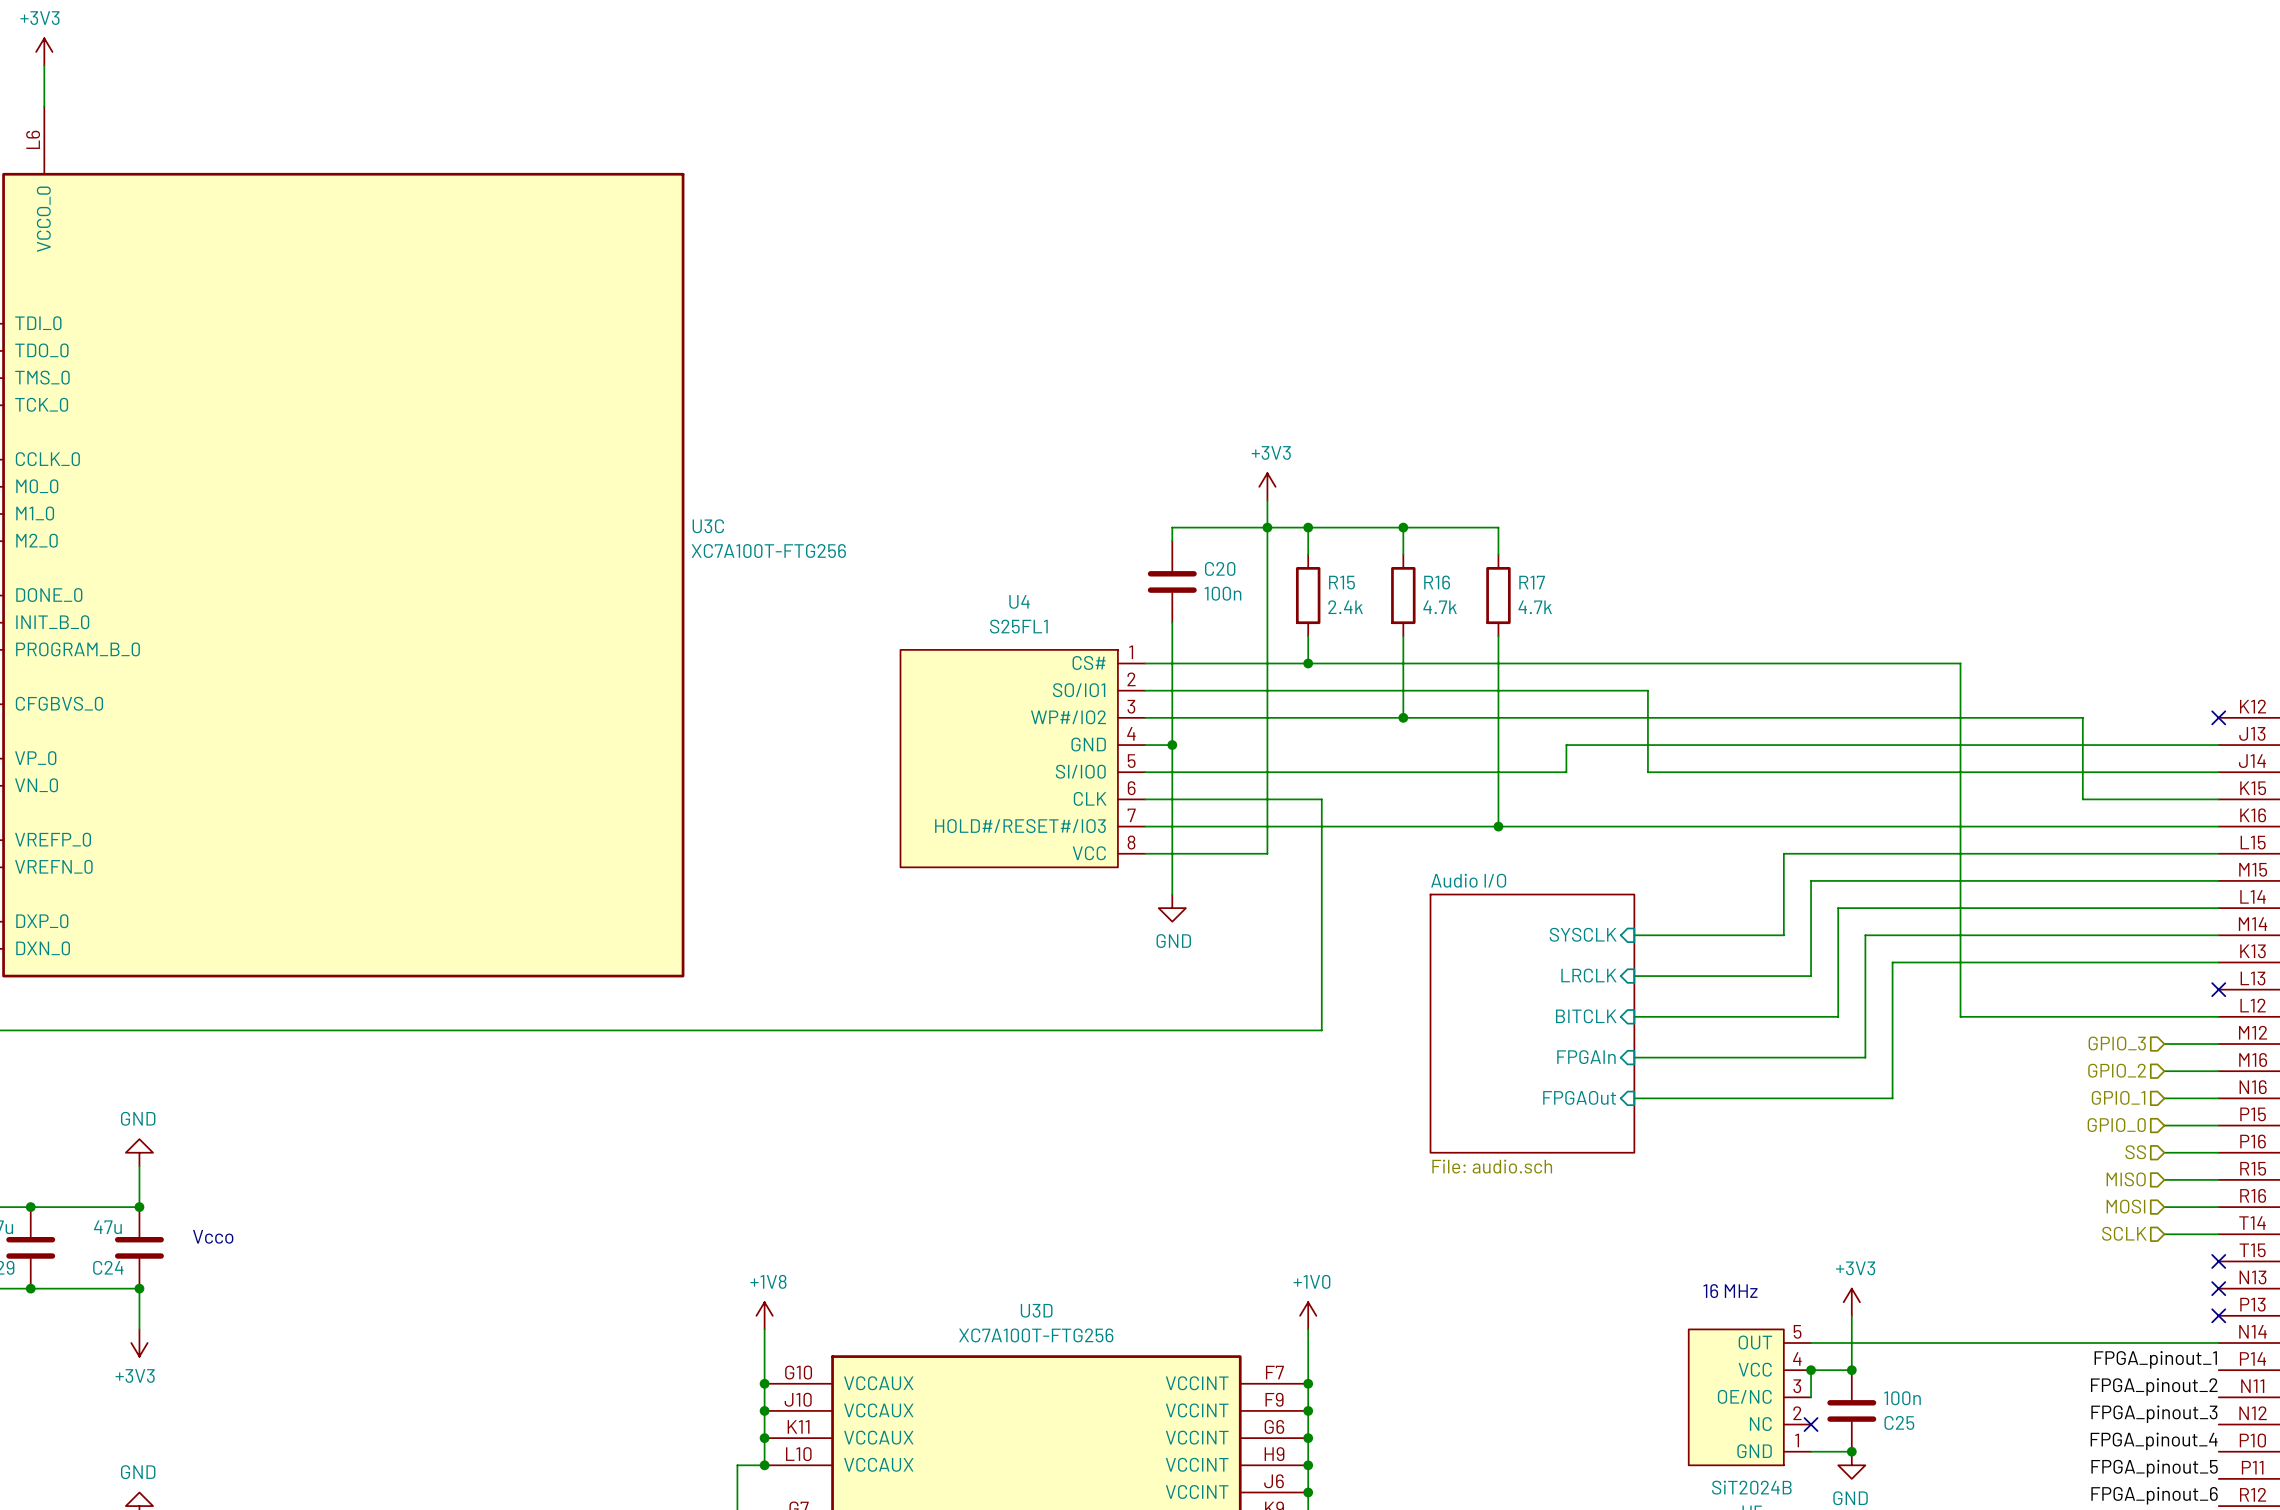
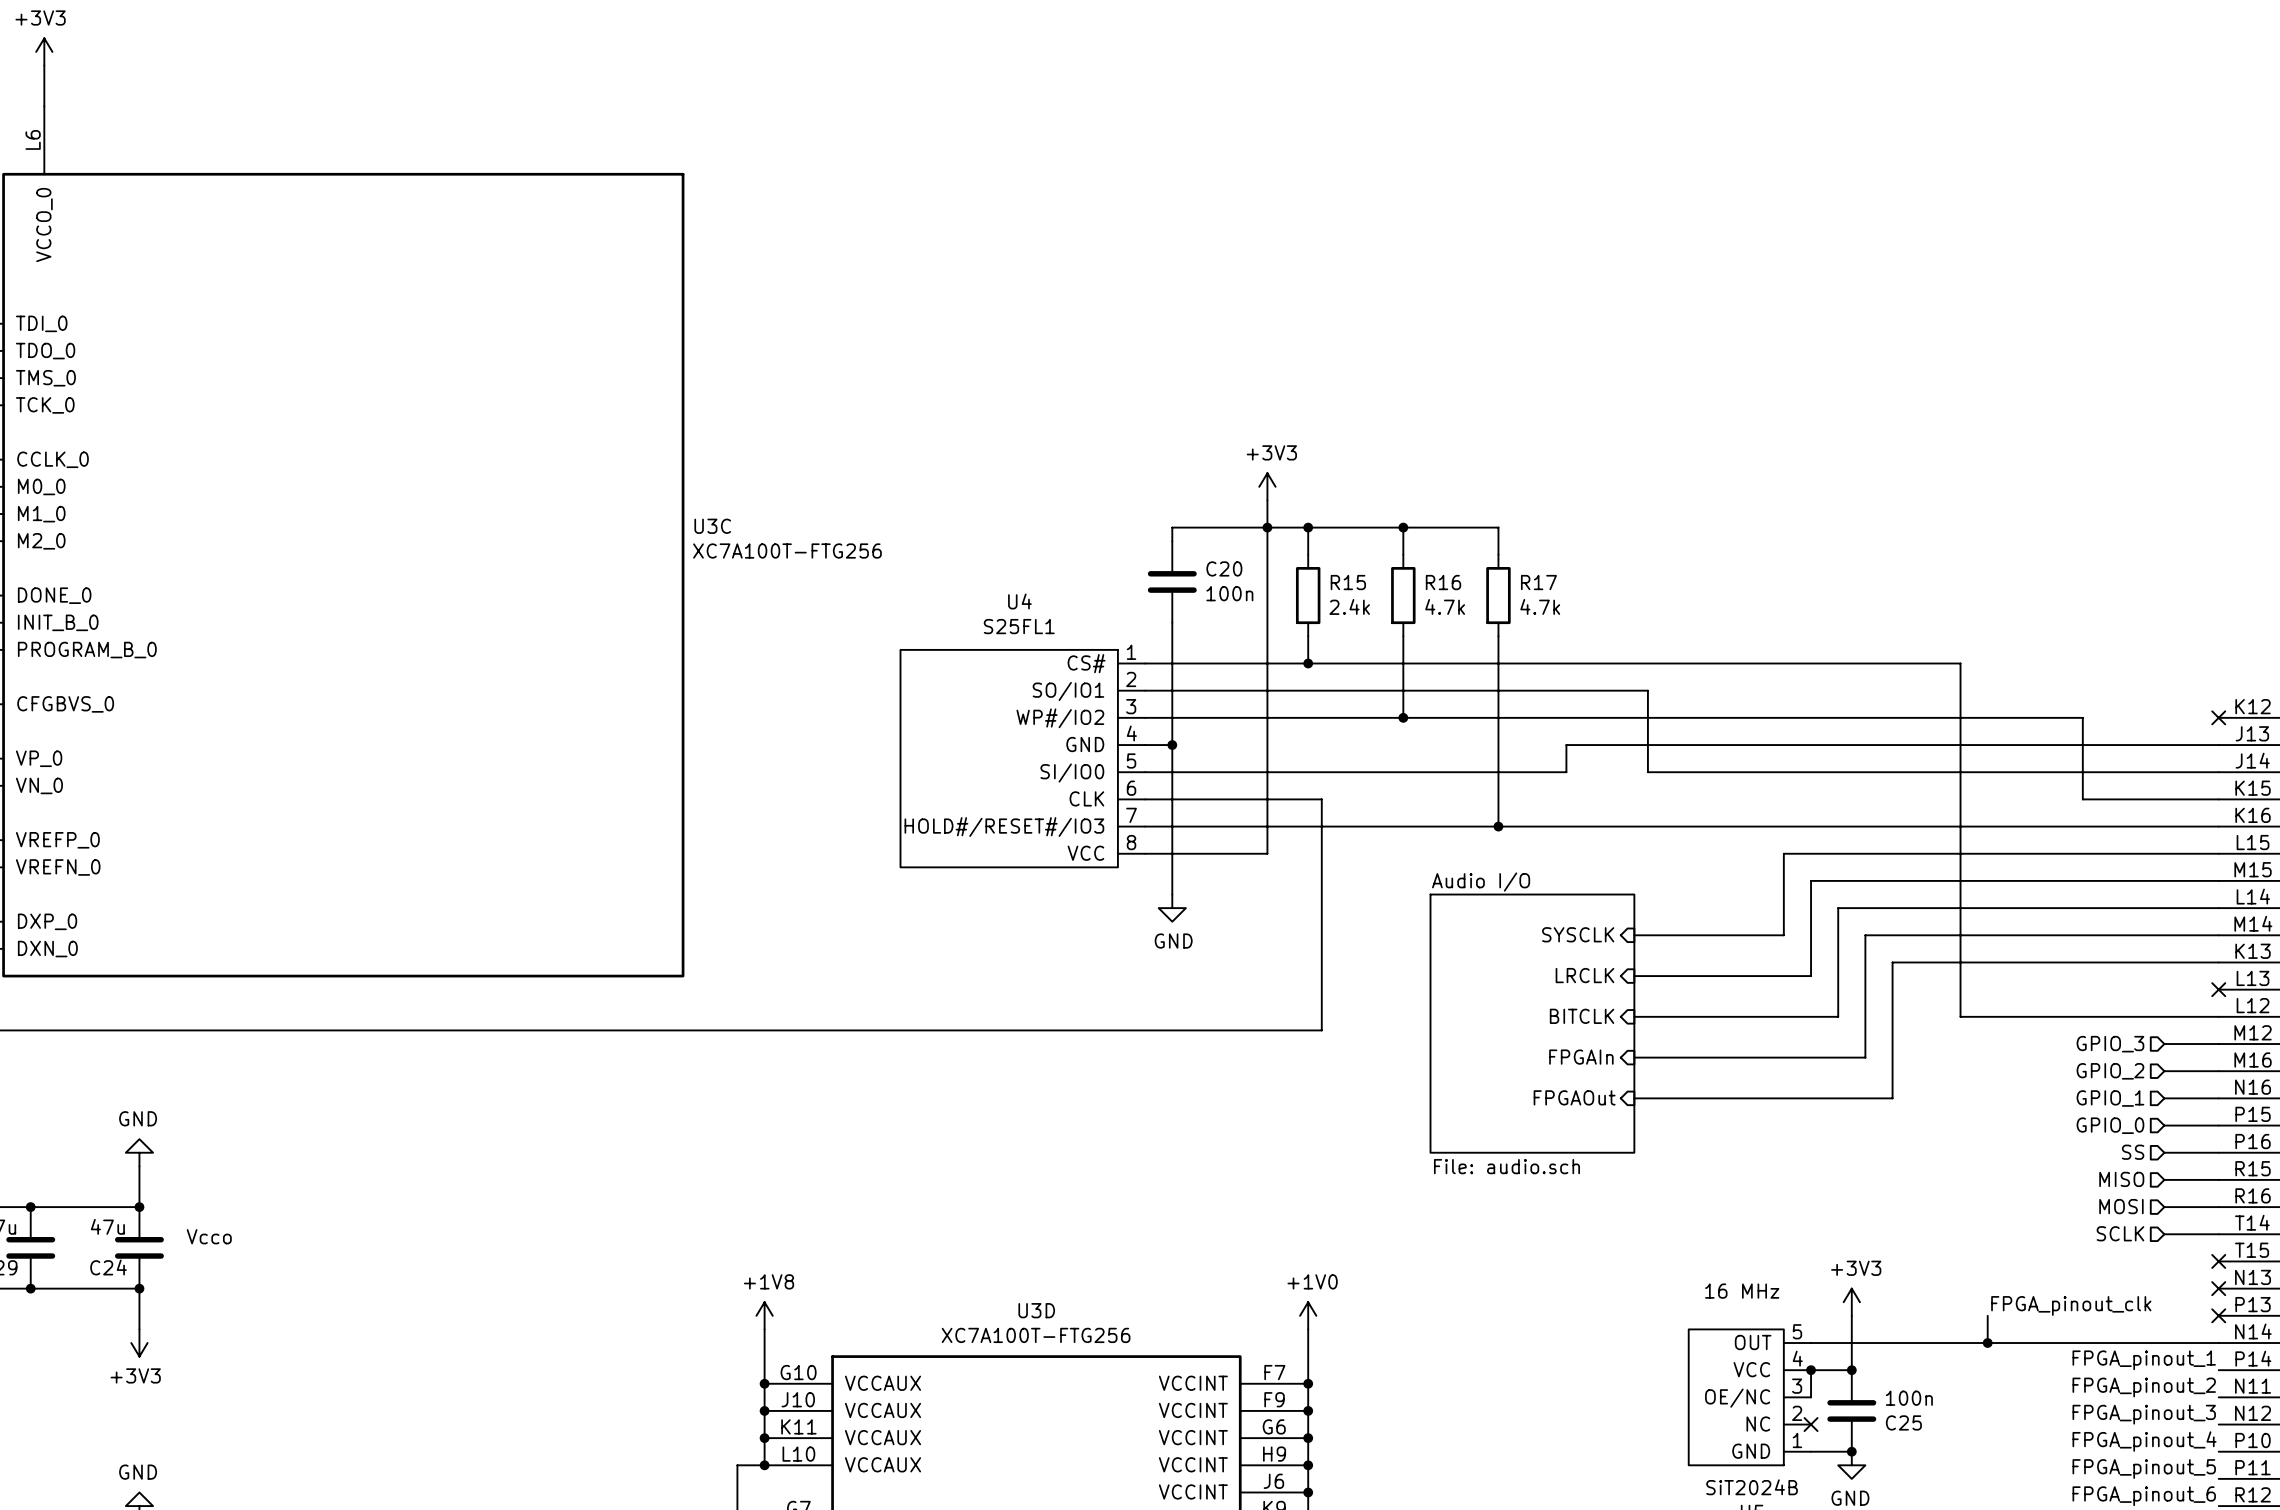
label: none -> FPGA_pinout_clk (2071, 1305)
wire: none -> (1987, 1315) (1987, 1343)
junction: none -> (1987, 1343)

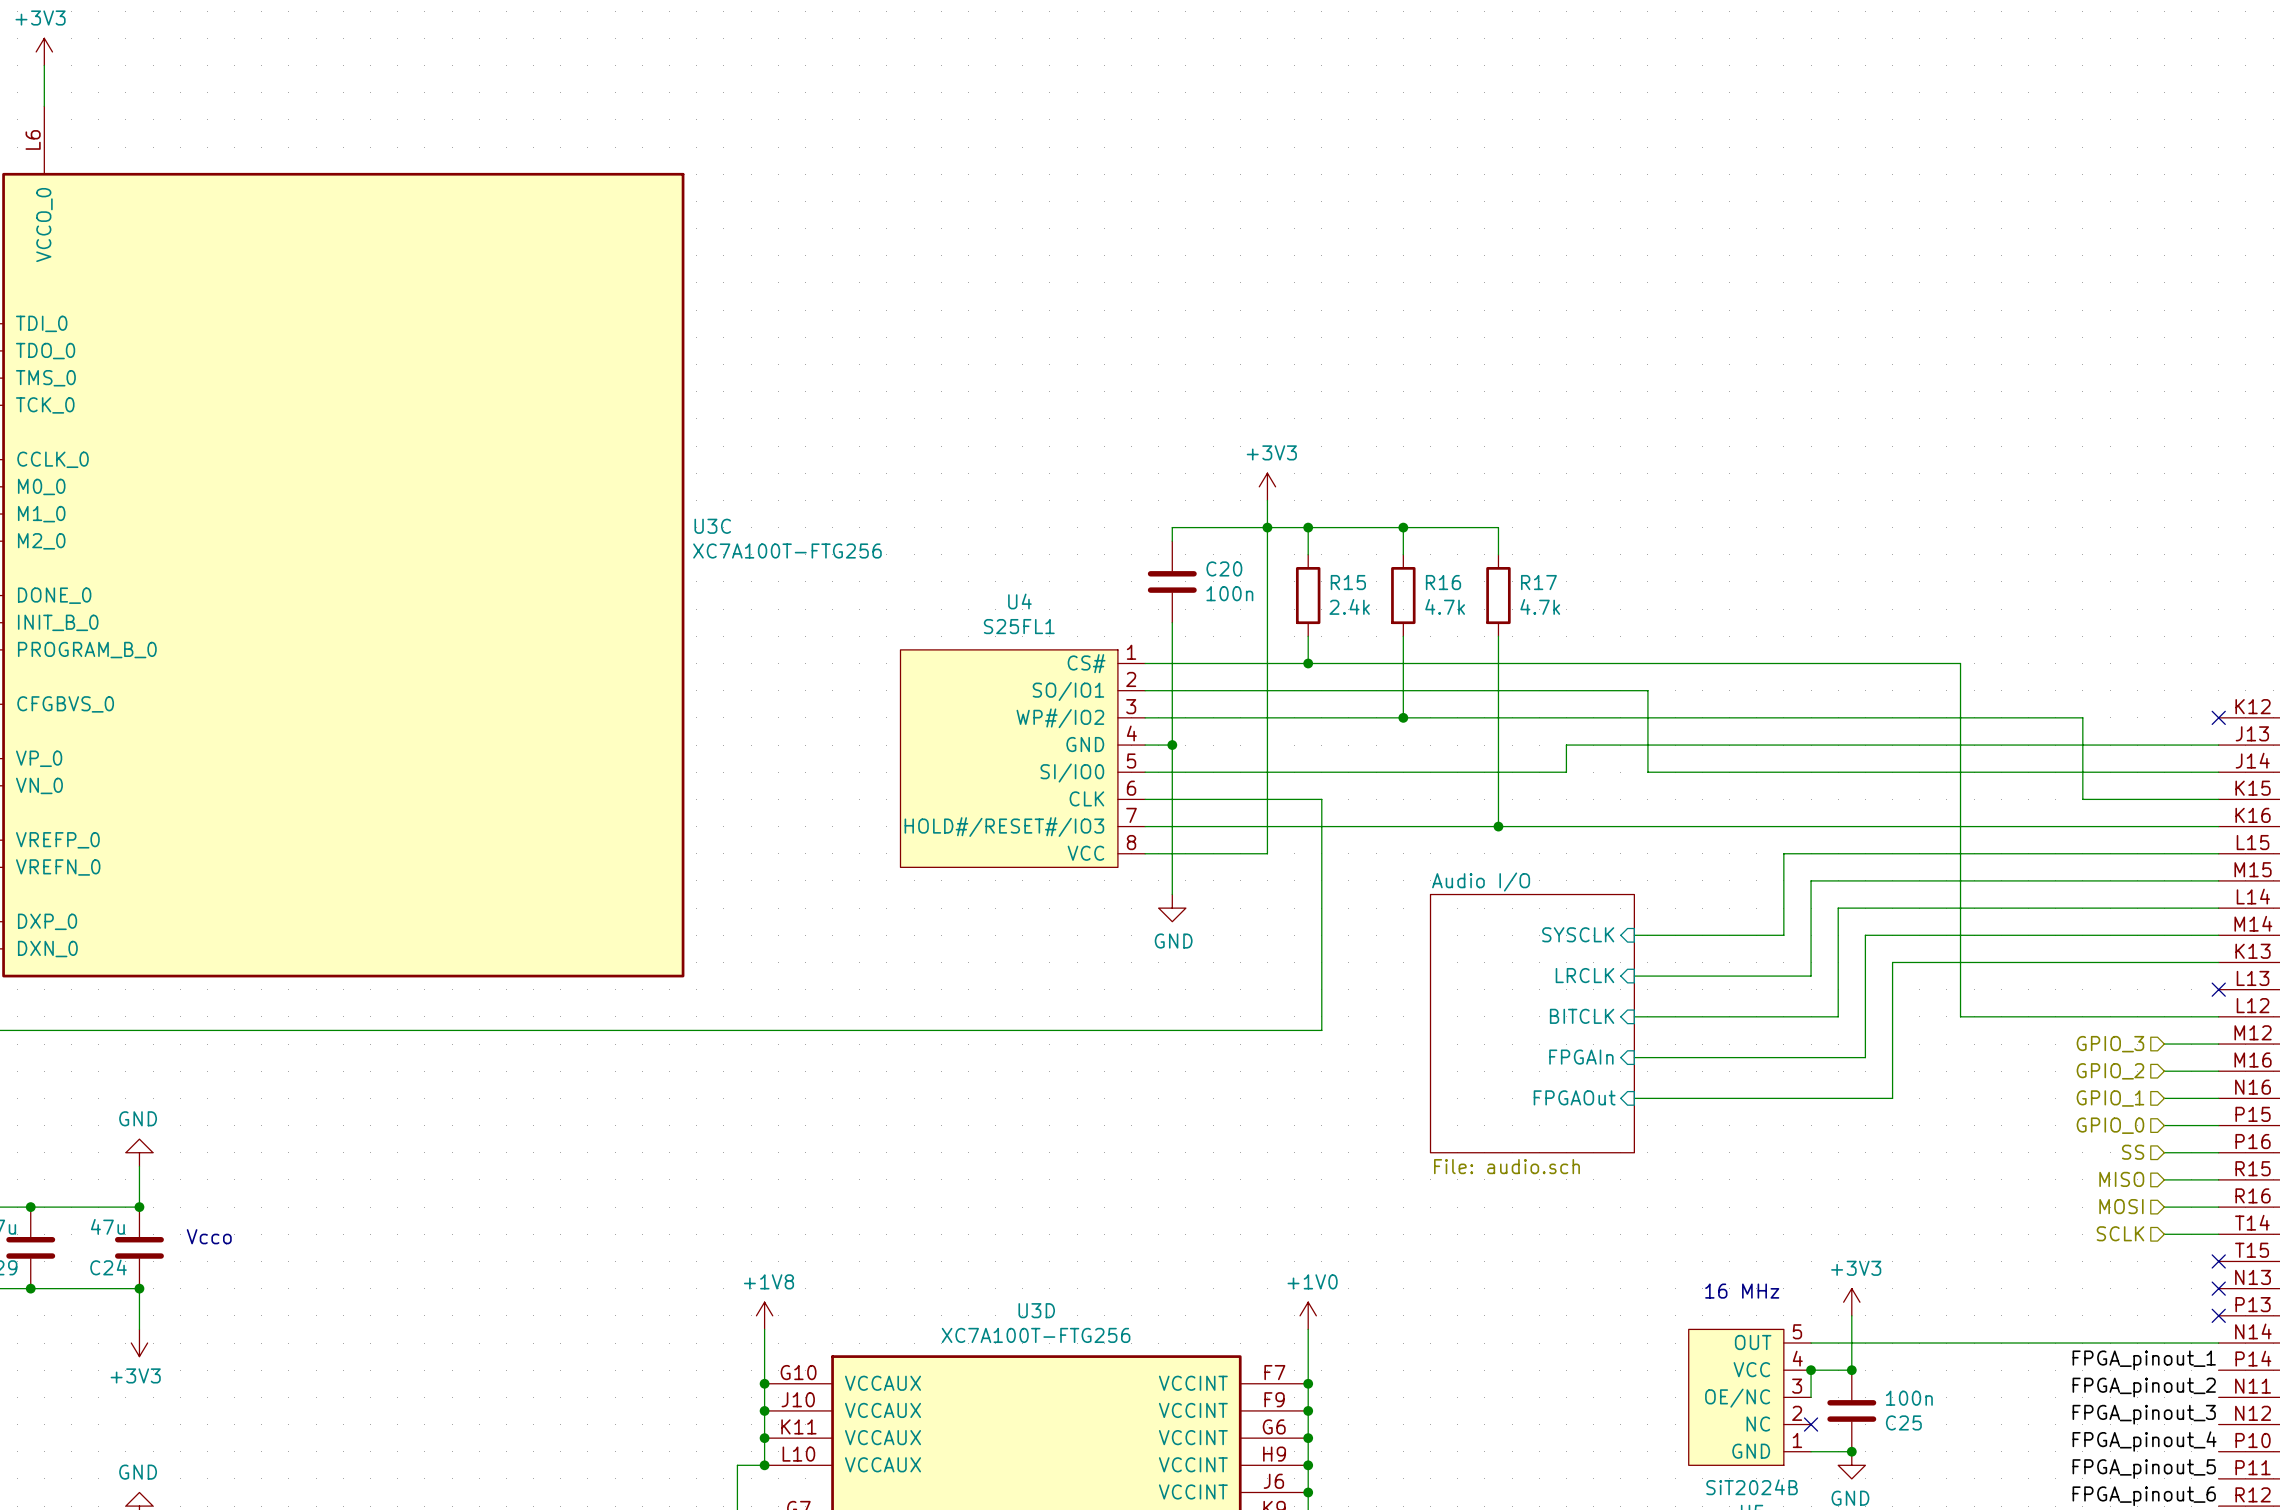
label: FPGA_pinout_clk (2071, 1305) -> none
wire: (1987, 1315) (1987, 1343) -> none
junction: (1987, 1343) -> none

